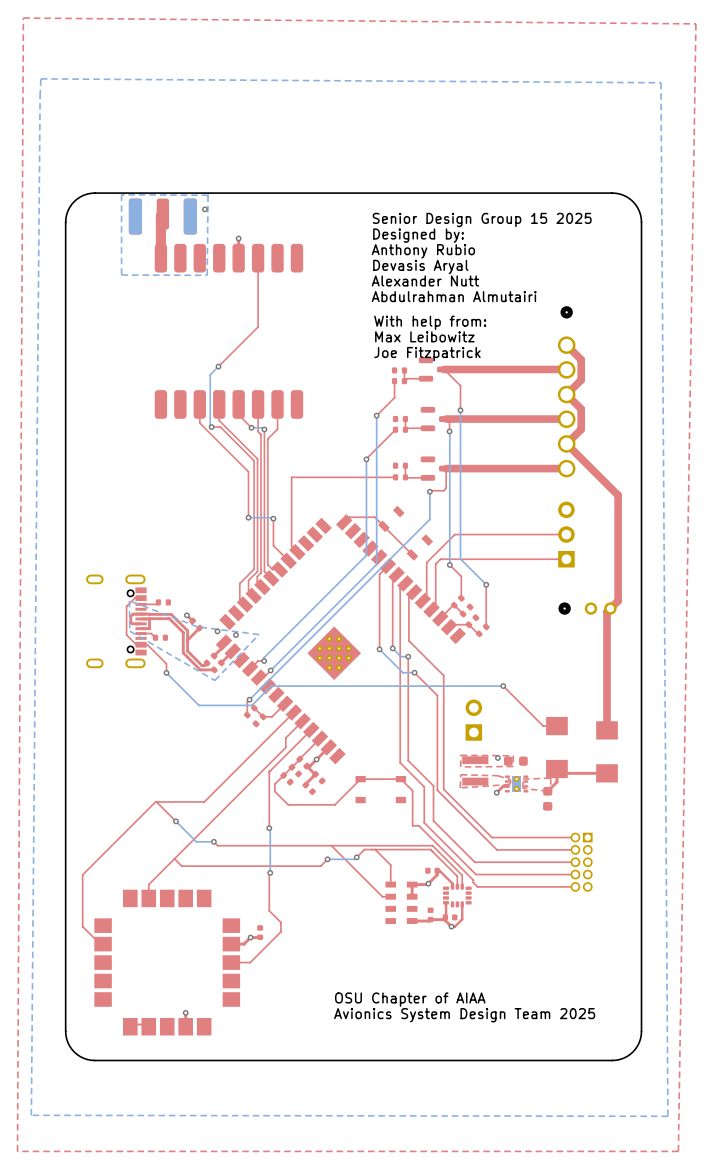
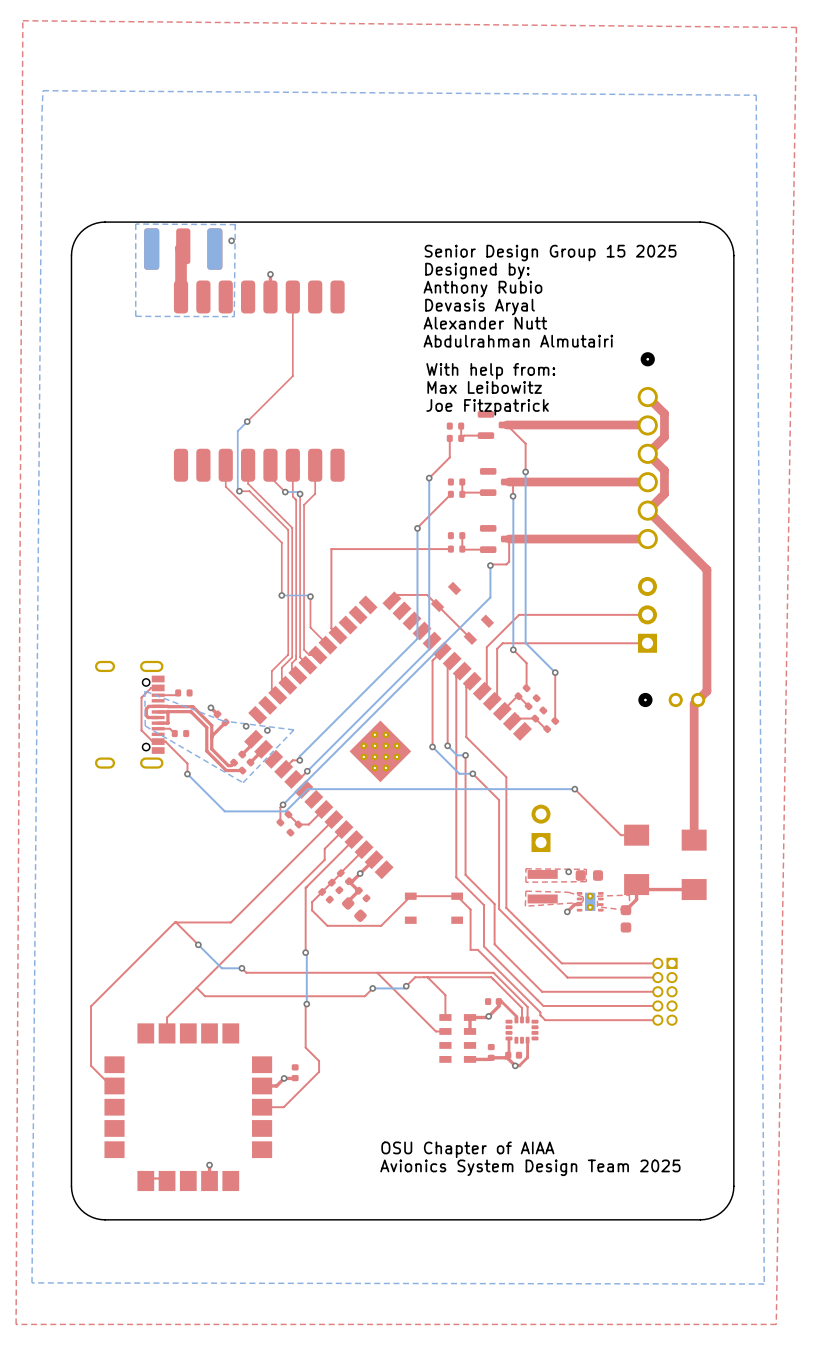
part footprint: [302, 781, 316, 796] -> [341, 897, 367, 923]

